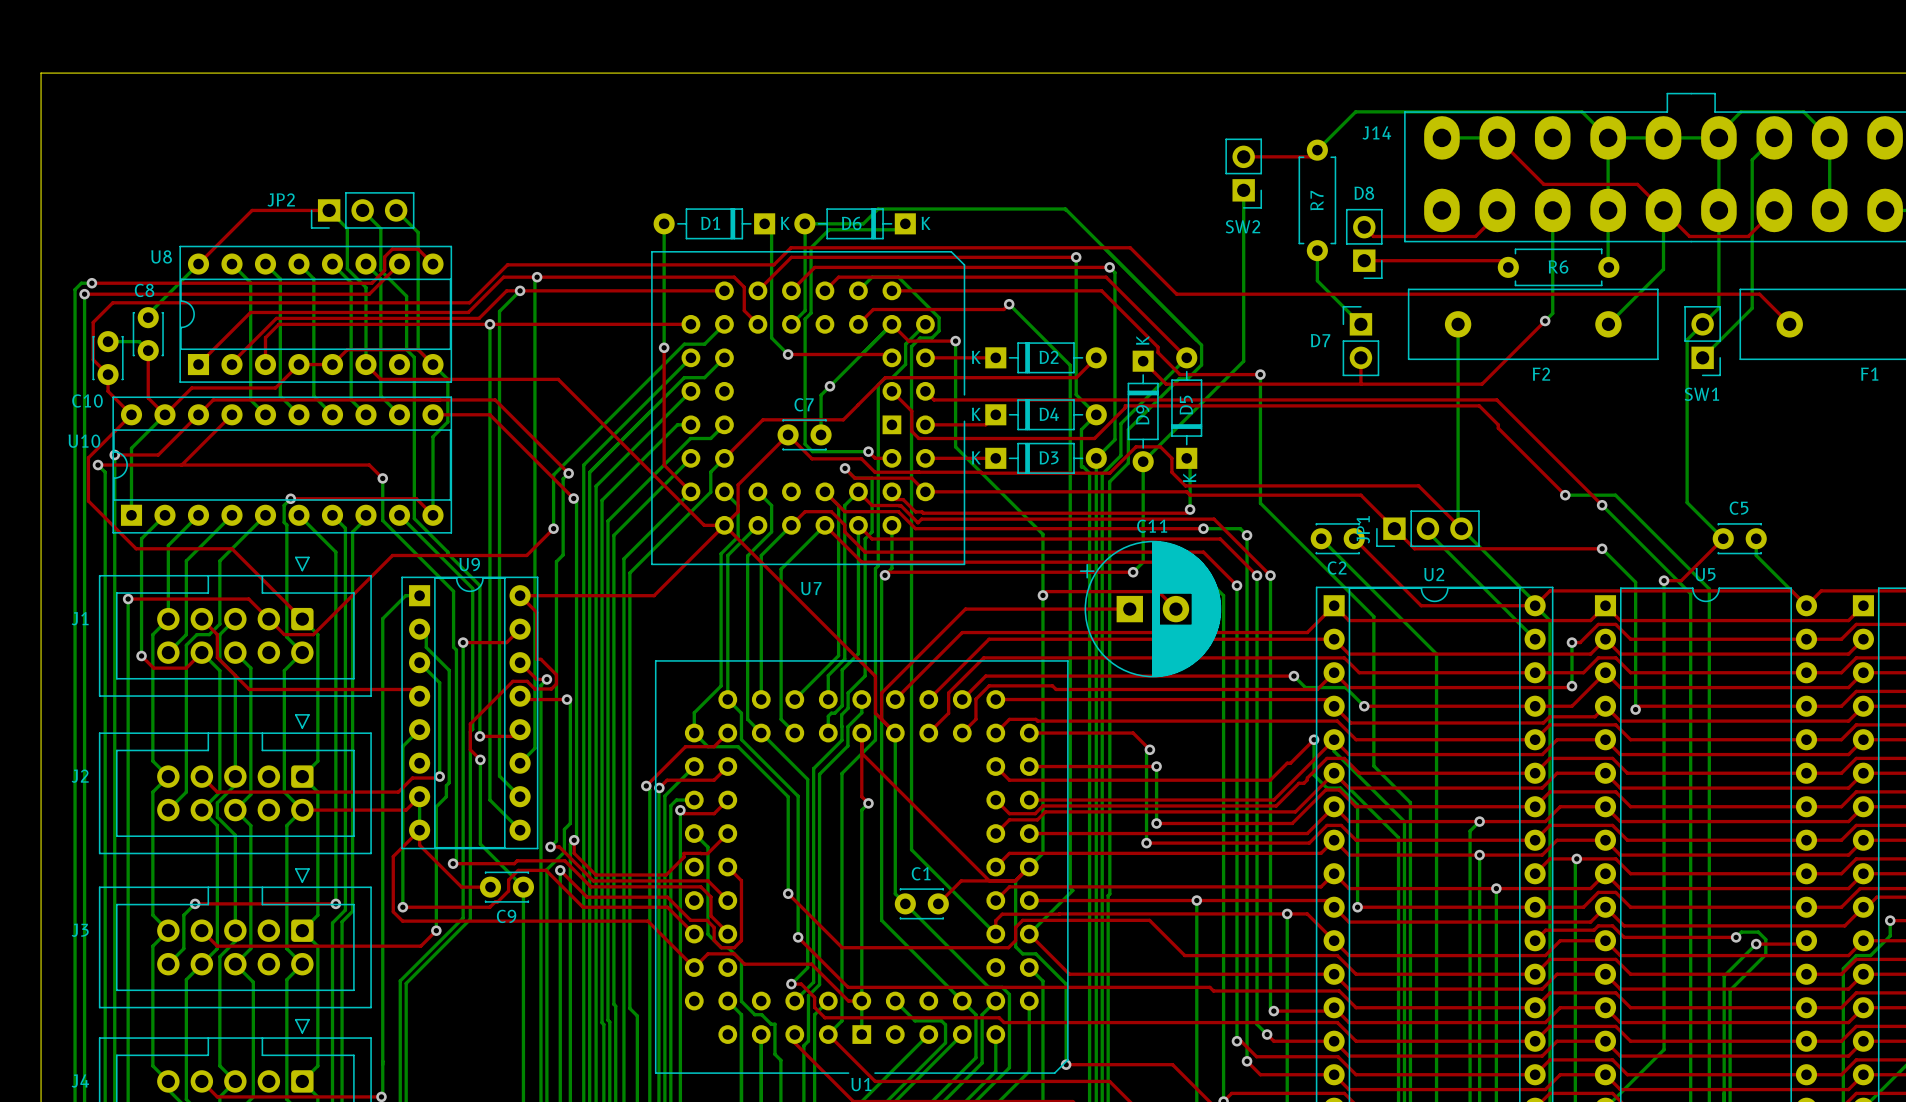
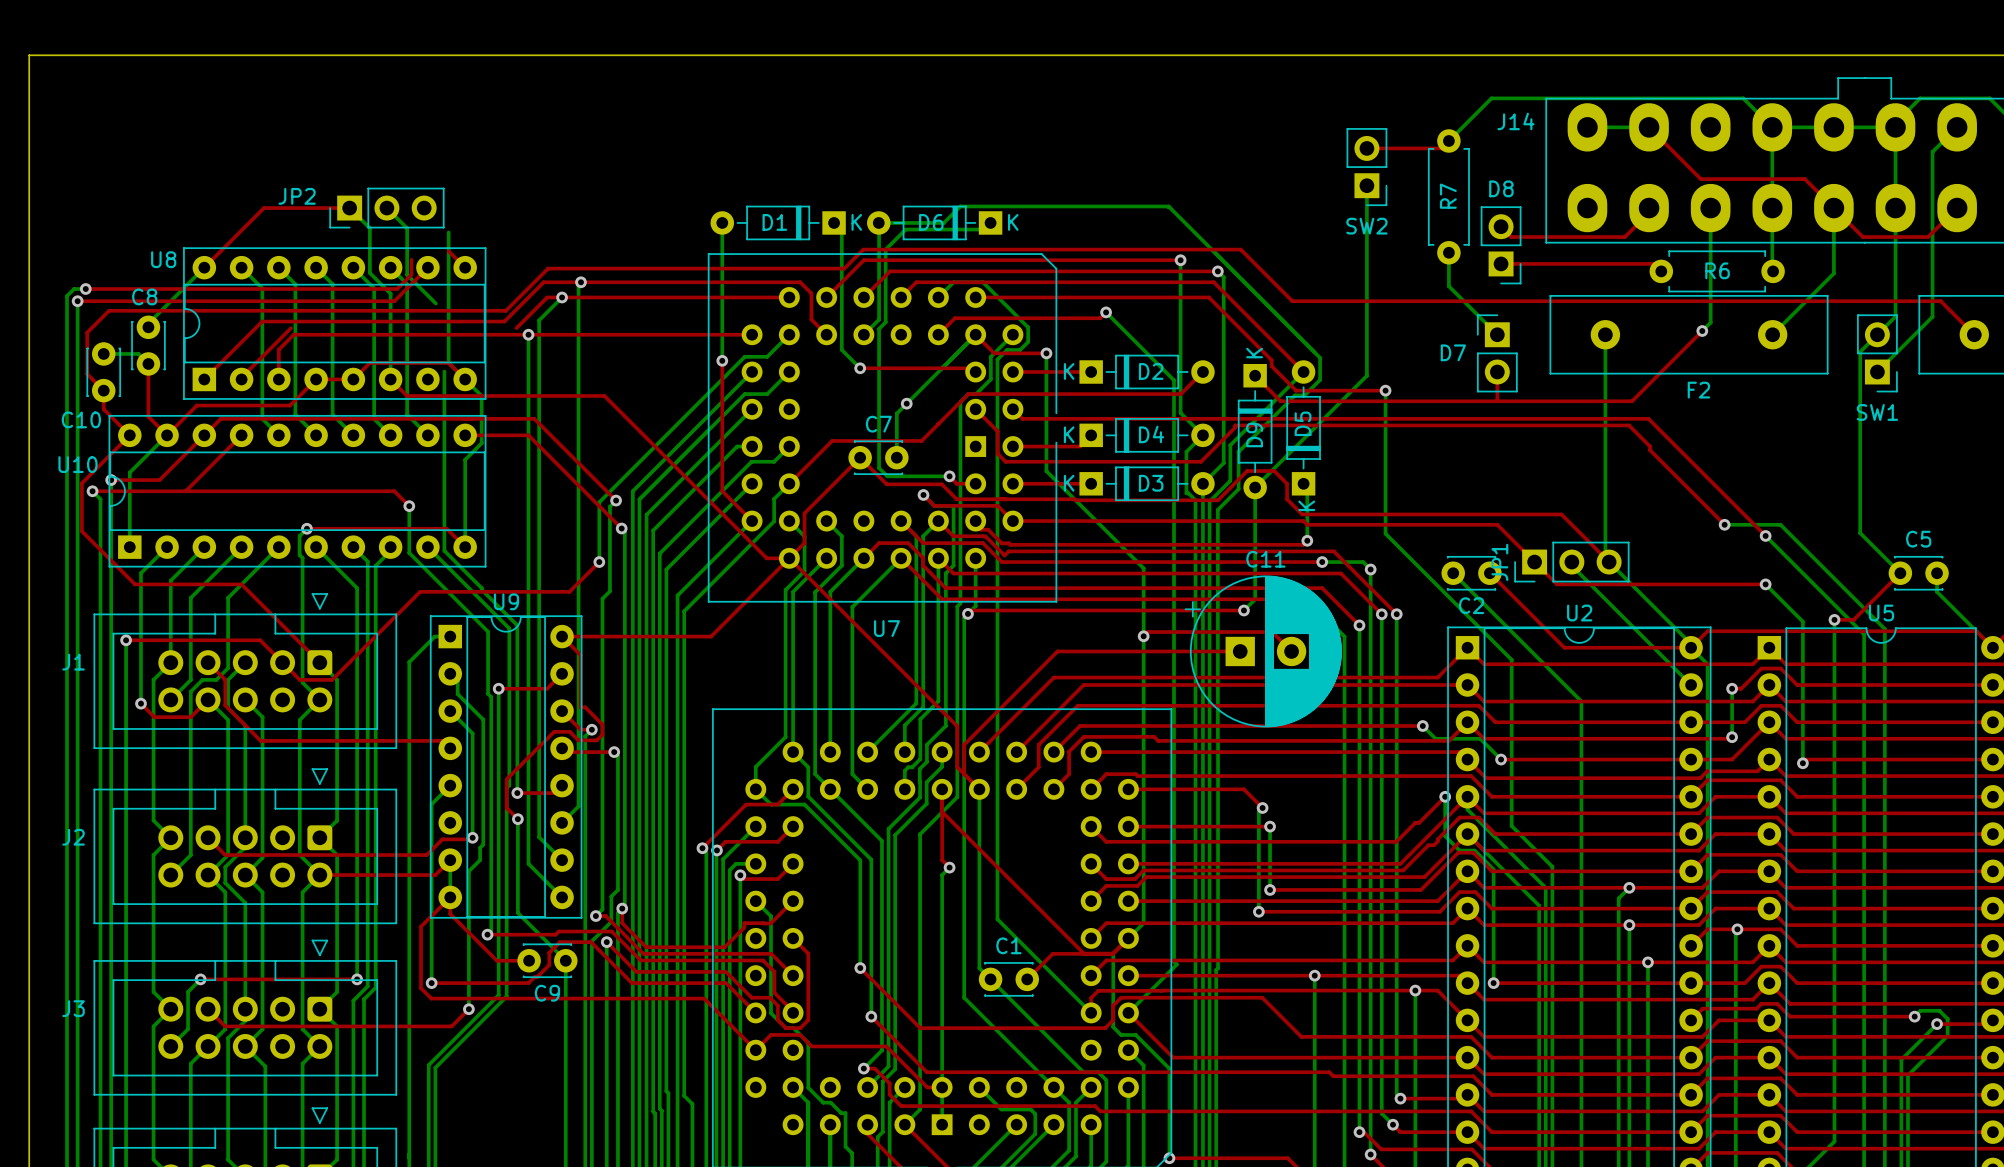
bottom track: (396, 210) (418, 232) -> none
top track: (418, 249) (392, 249) (384, 256) -> none
bottom track: (406, 296) (406, 349) (414, 357) -> none
top track: (276, 318) (479, 318) -> none

